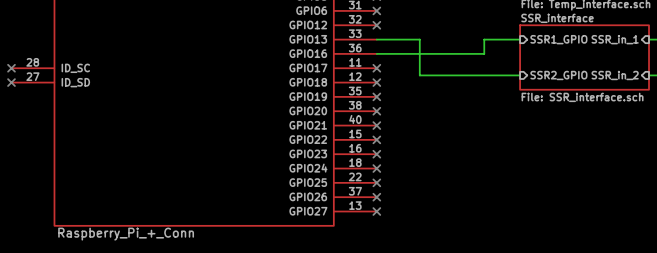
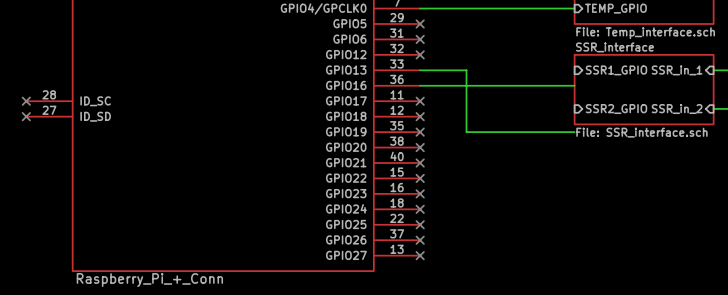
wire: (520, 39) (484, 39) (484, 53) -> (574, 85) (536, 85)
wire: (419, 75) (520, 75) -> (466, 108) (466, 132) (574, 132)

